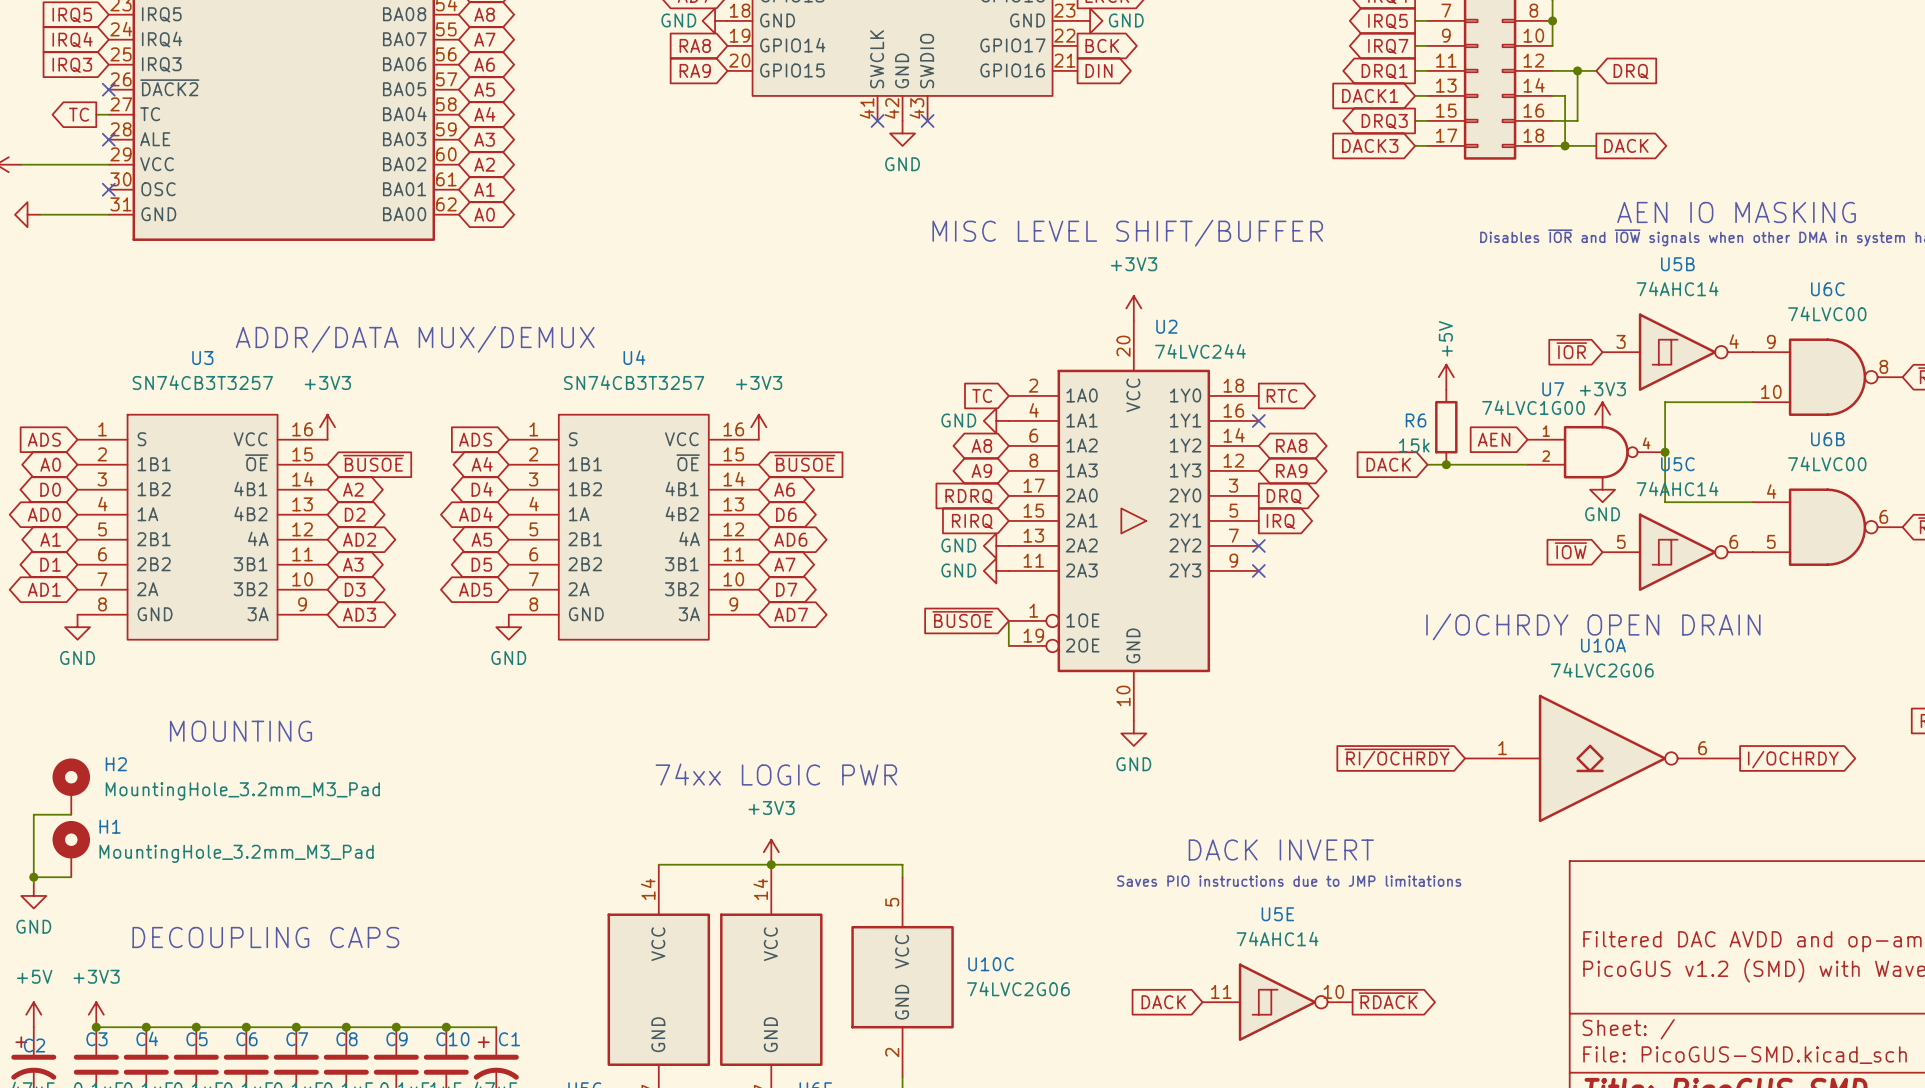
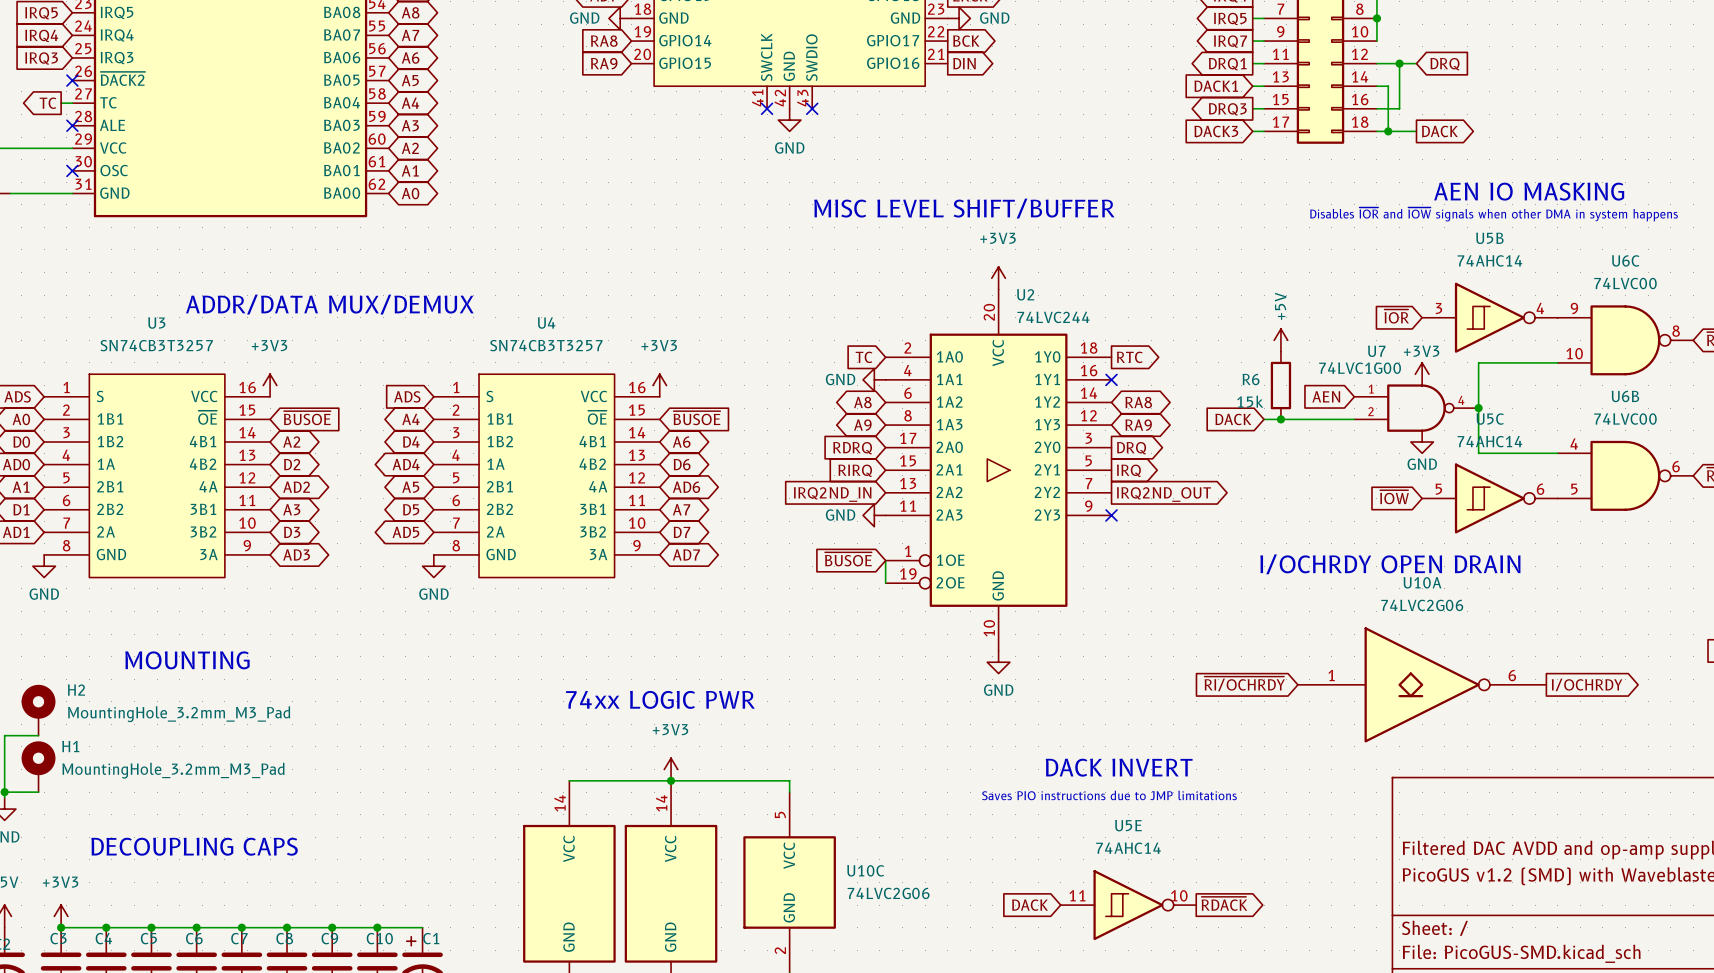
power symbol: GND (996, 545) -> none
no-connect mark: (1258, 545) -> none
global label: none -> IRQ2ND_IN (832, 494)
global label: none -> IRQ2ND_OUT (1163, 494)

